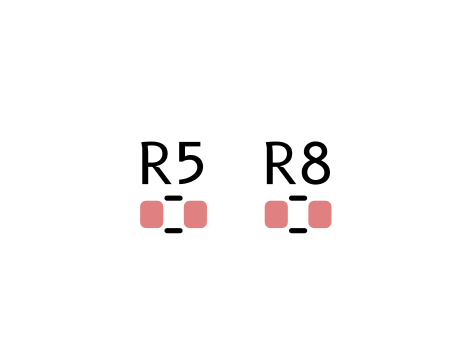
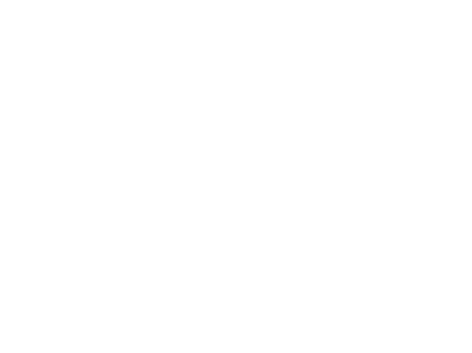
R5: (173, 214) -> none
R8: (298, 214) -> none

